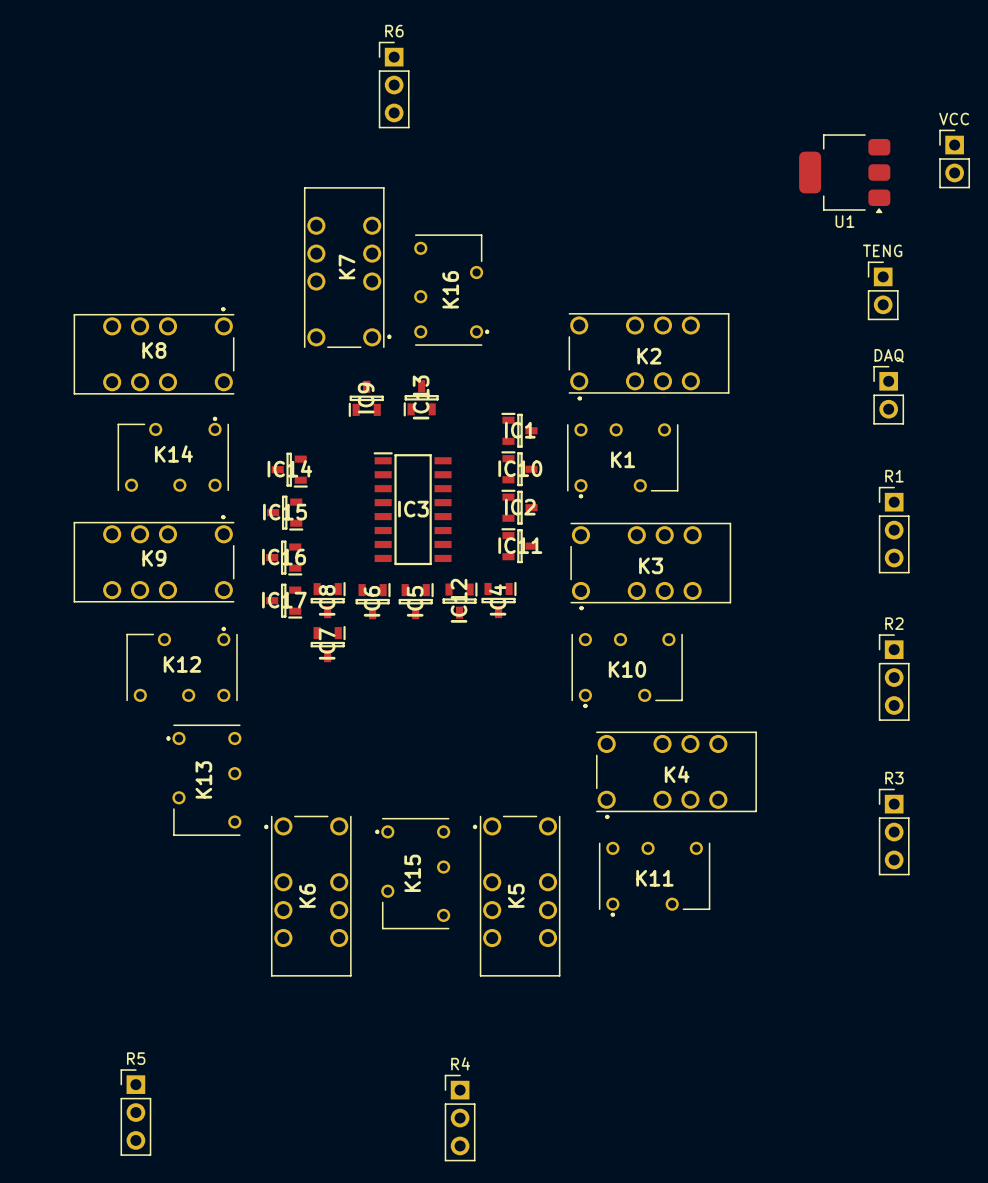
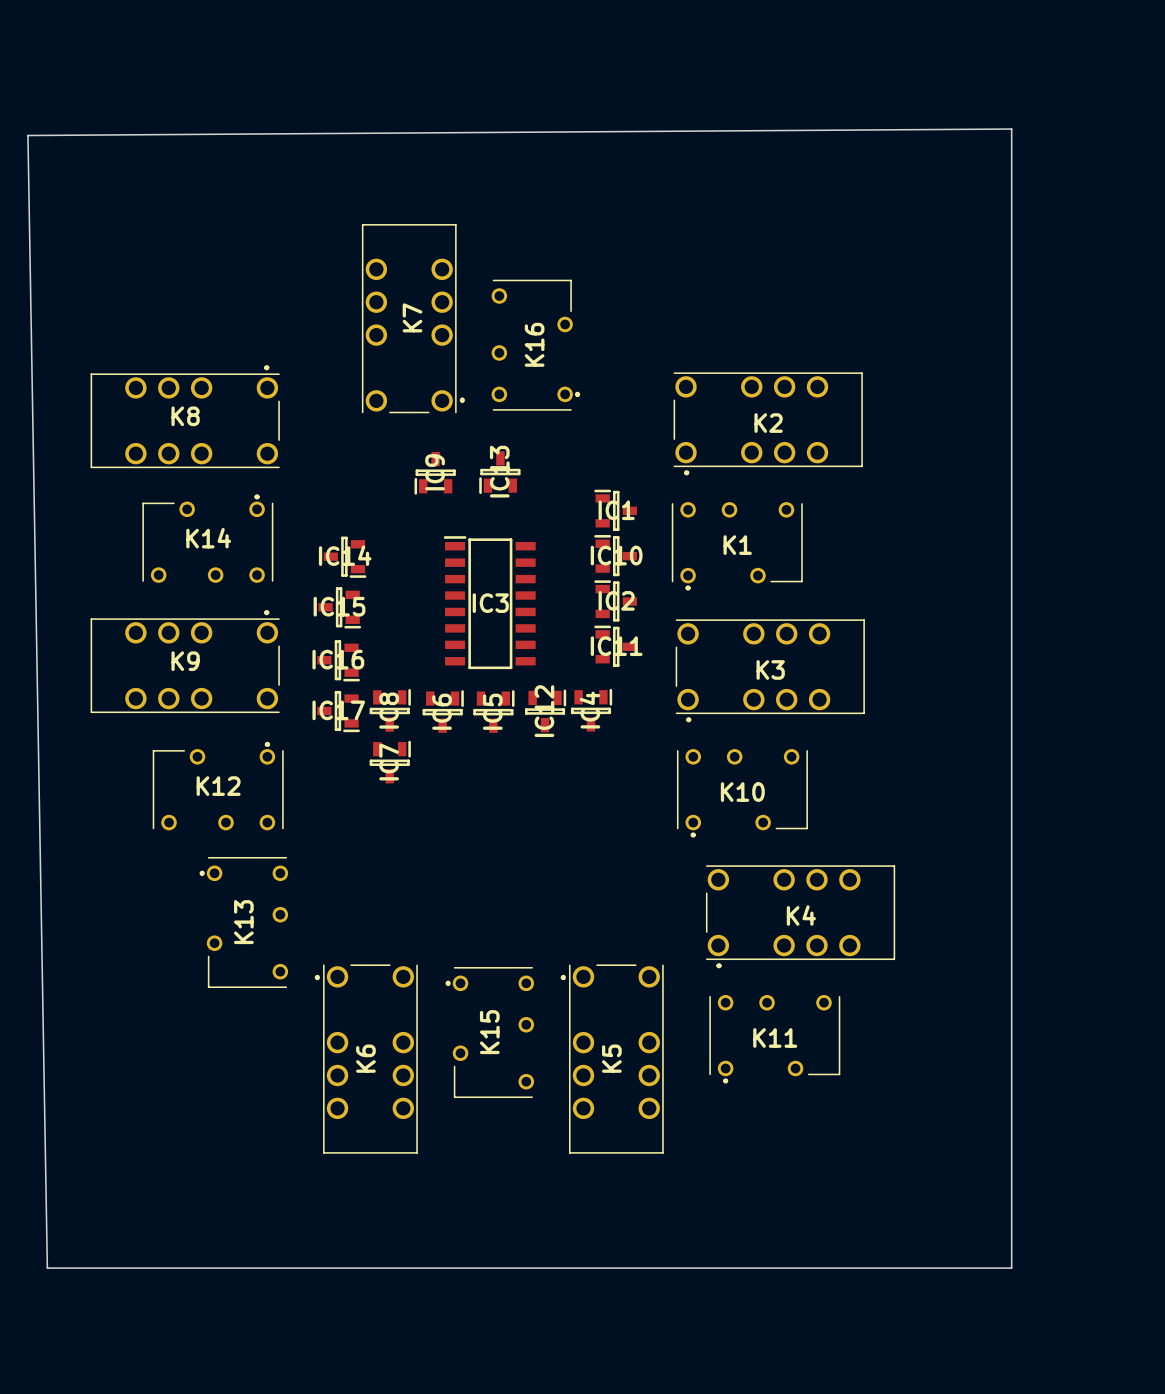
R6: (394, 85) -> none
board edge: none -> (1011, 129) (1011, 1268) (47, 1268) (27, 135) (1011, 129)
VCC: (954, 158) -> none
U1: (844, 173) -> none
TENG: (883, 290) -> none
DAQ: (888, 395) -> none
R1: (894, 530) -> none
R2: (894, 677) -> none
R3: (894, 832) -> none
R5: (135, 1112) -> none
R4: (460, 1118) -> none

